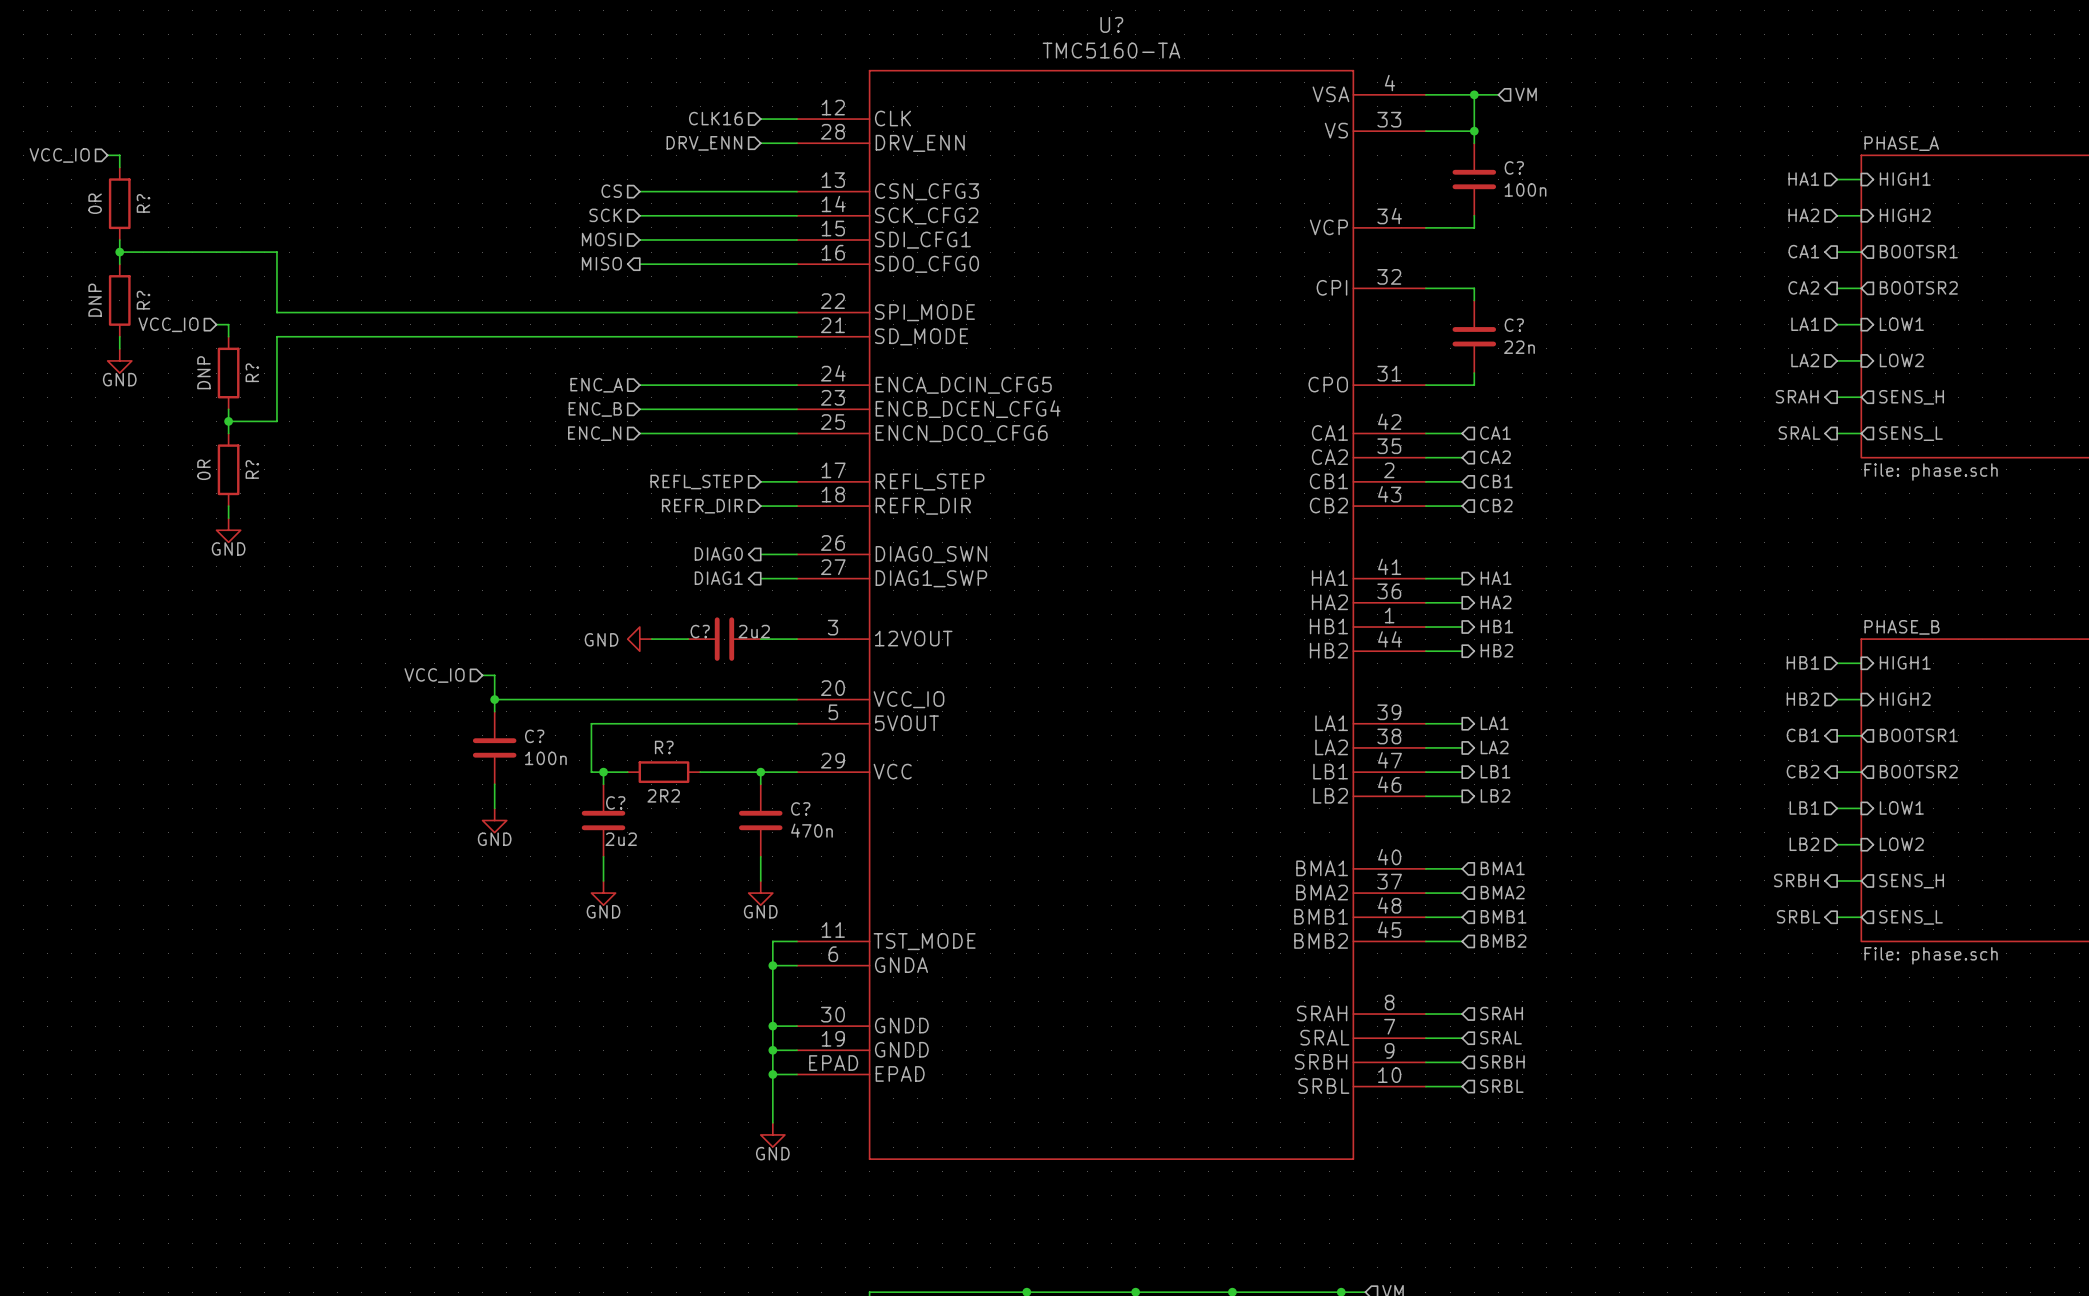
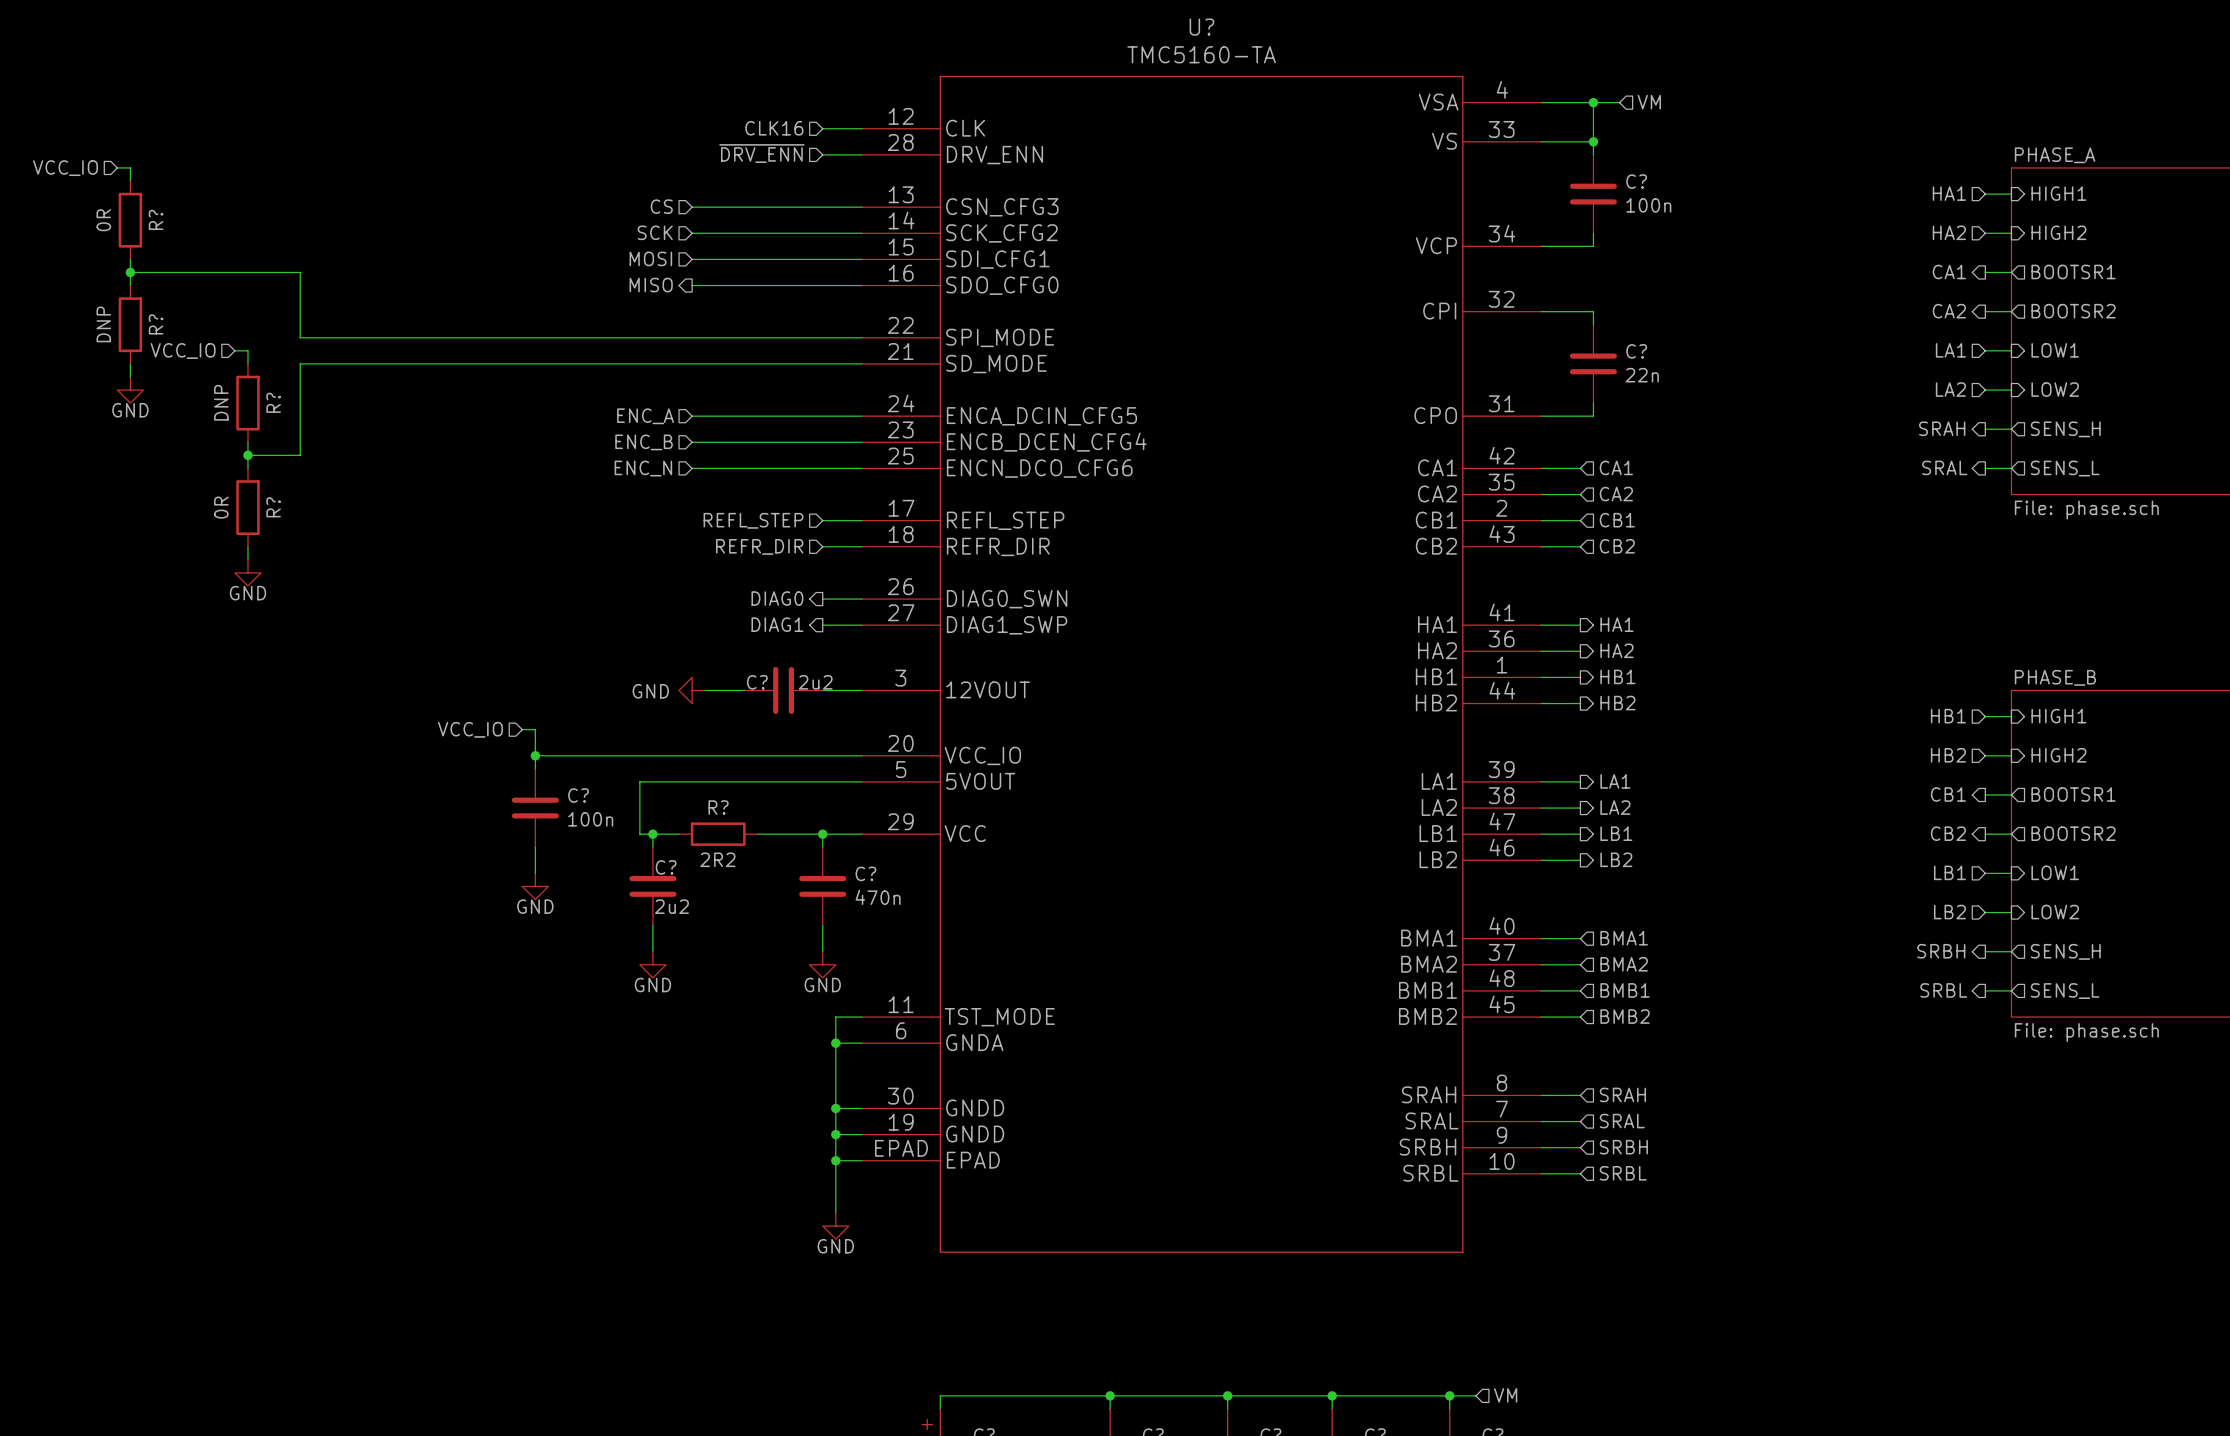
hierarchical label: DRV_ENN (704, 143) -> ~{DRV_ENN} (761, 153)

